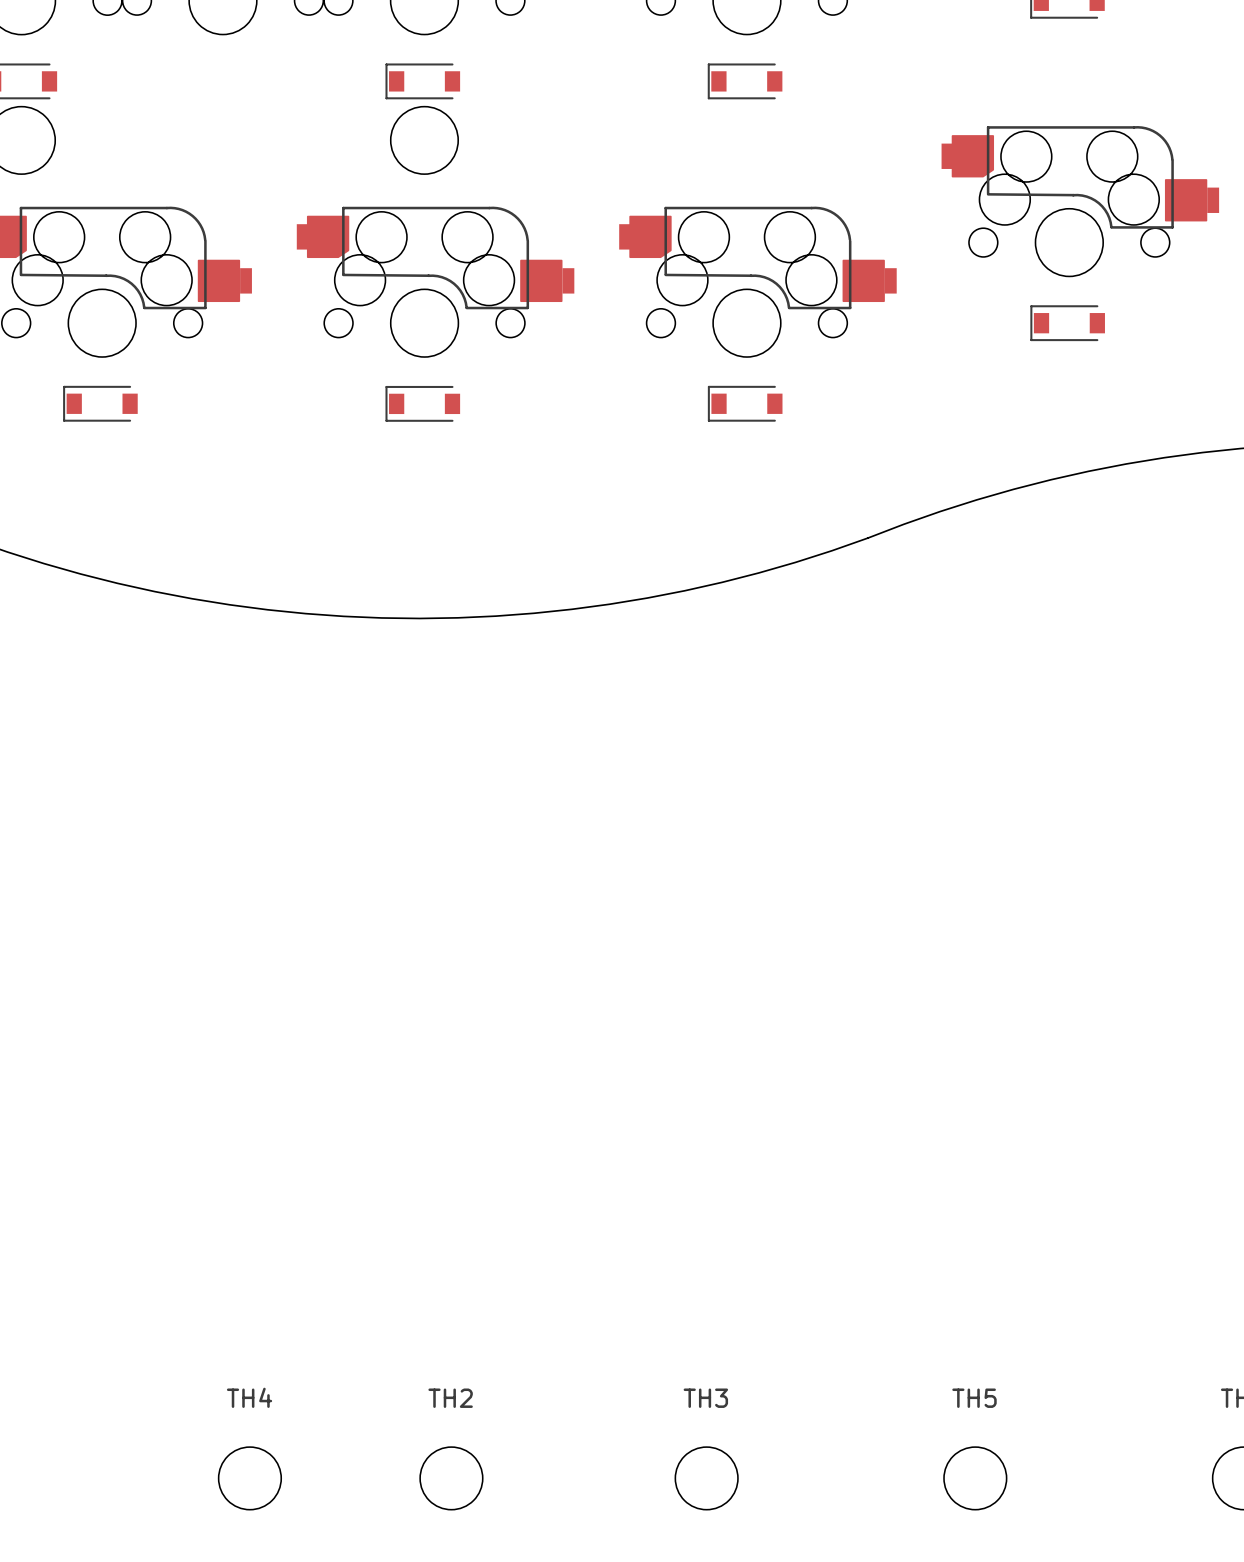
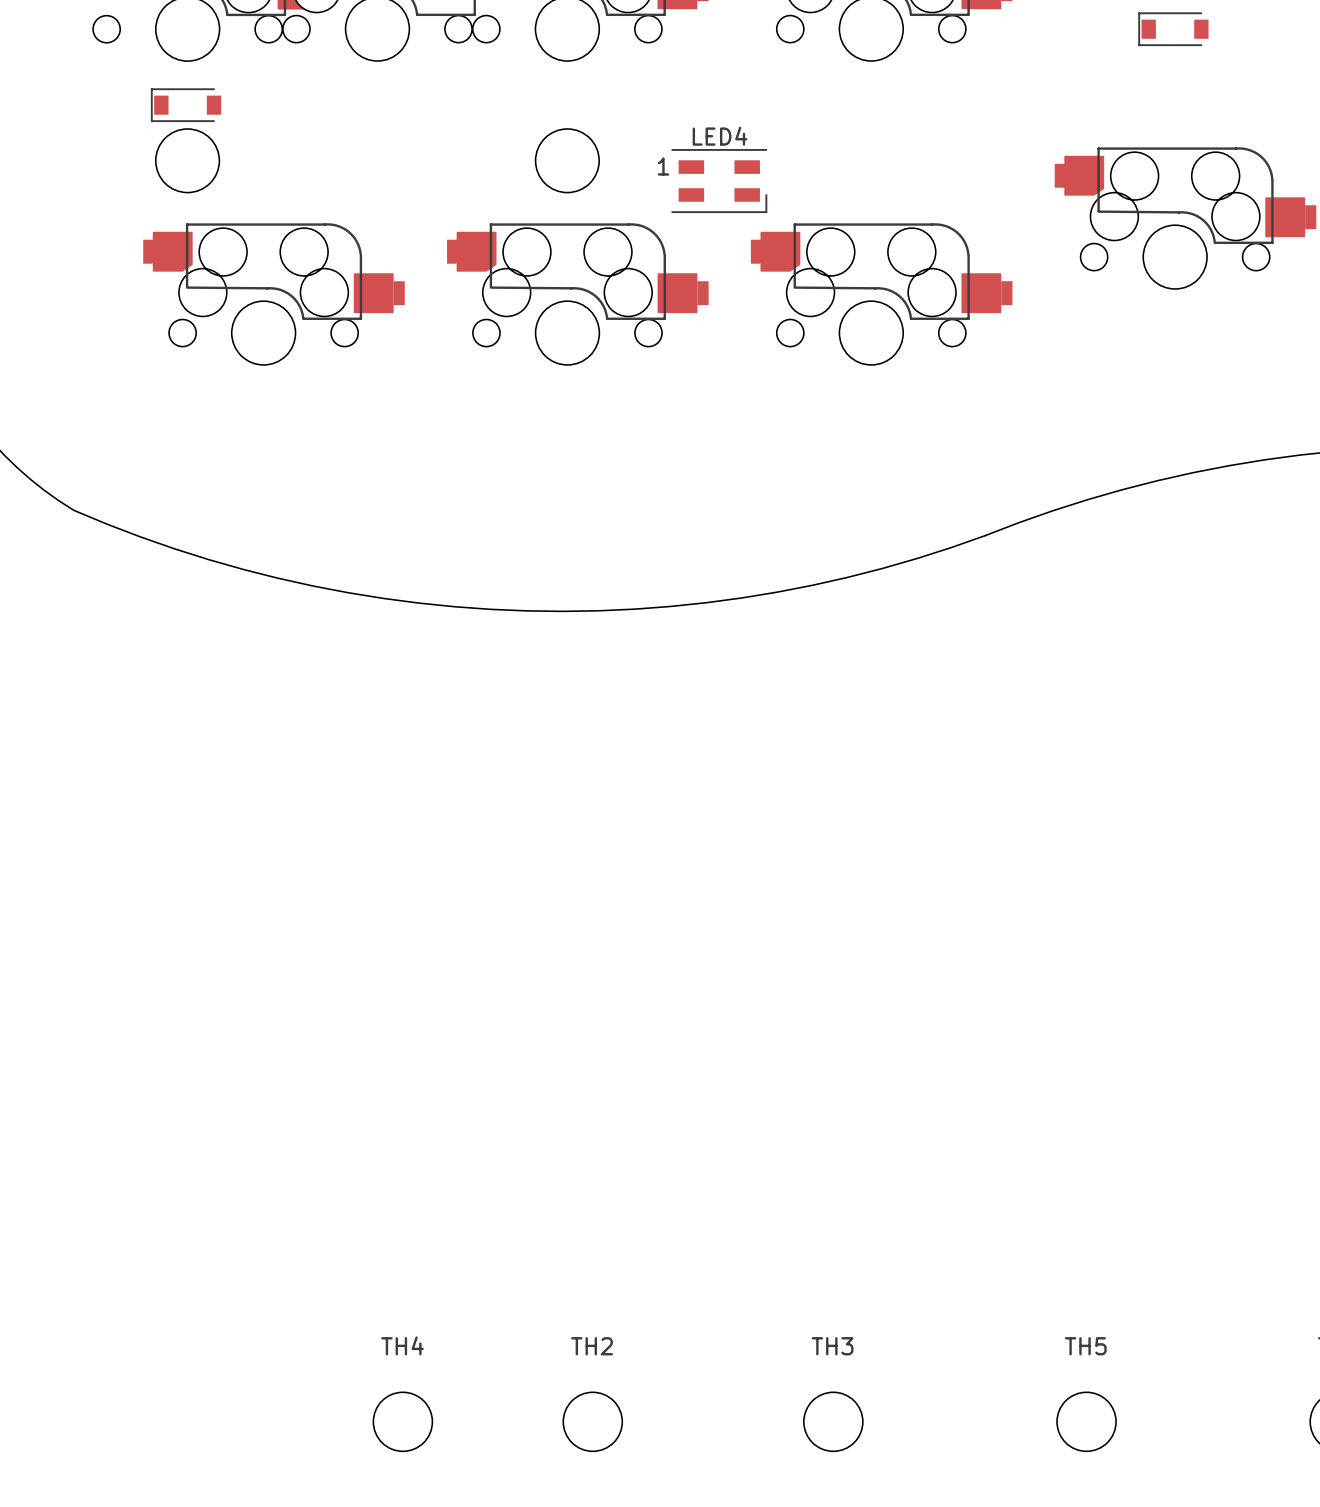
part: (422, 81) -> none
part: (745, 81) -> none
LED4: none -> (719, 181)
part: (1067, 323) -> none
part: (100, 403) -> none
part: (422, 403) -> none
part: (745, 403) -> none

